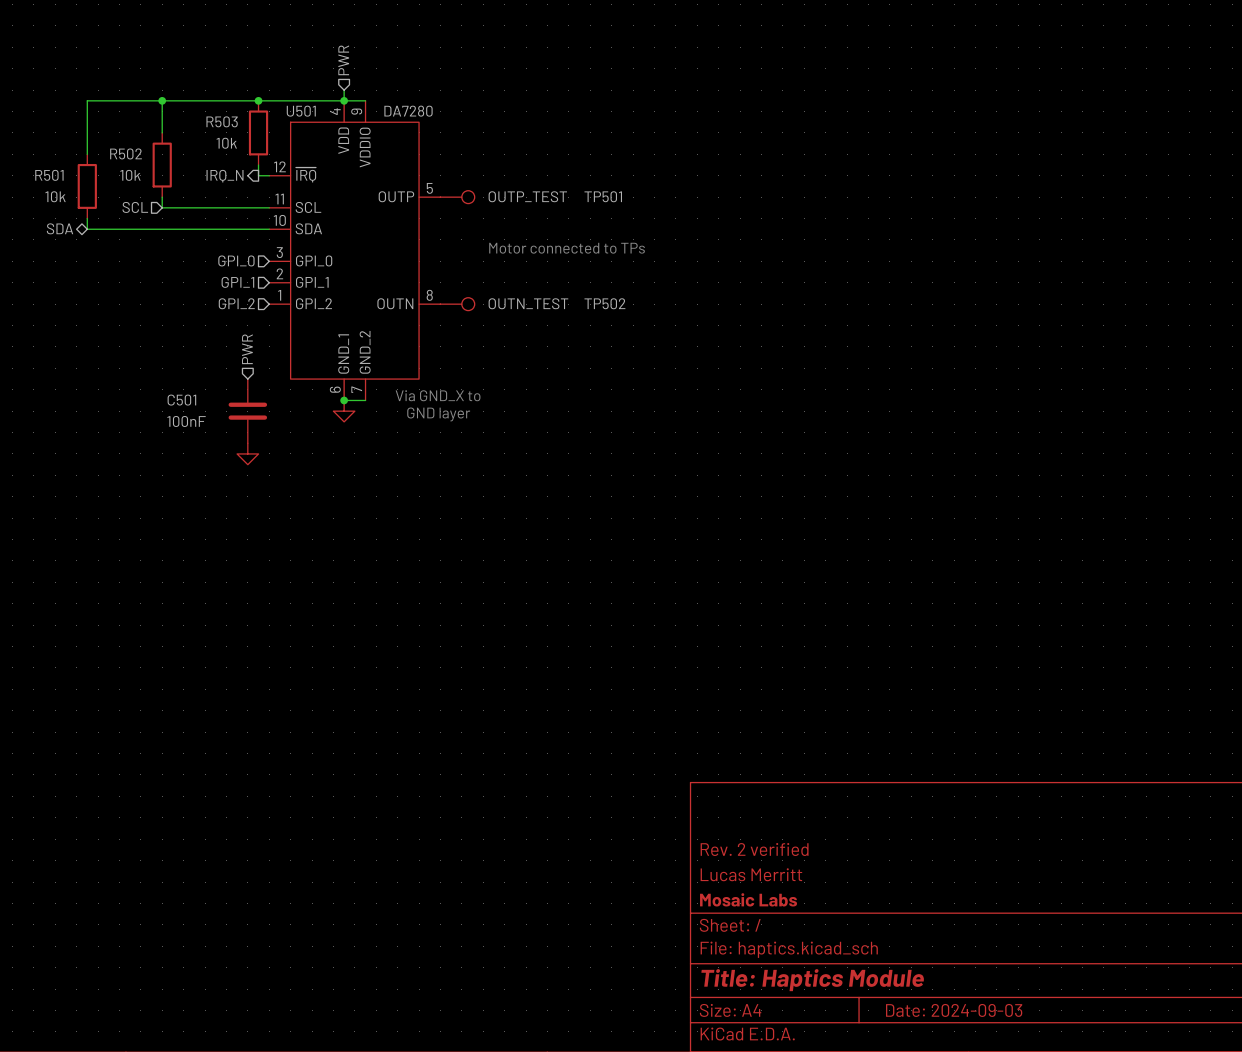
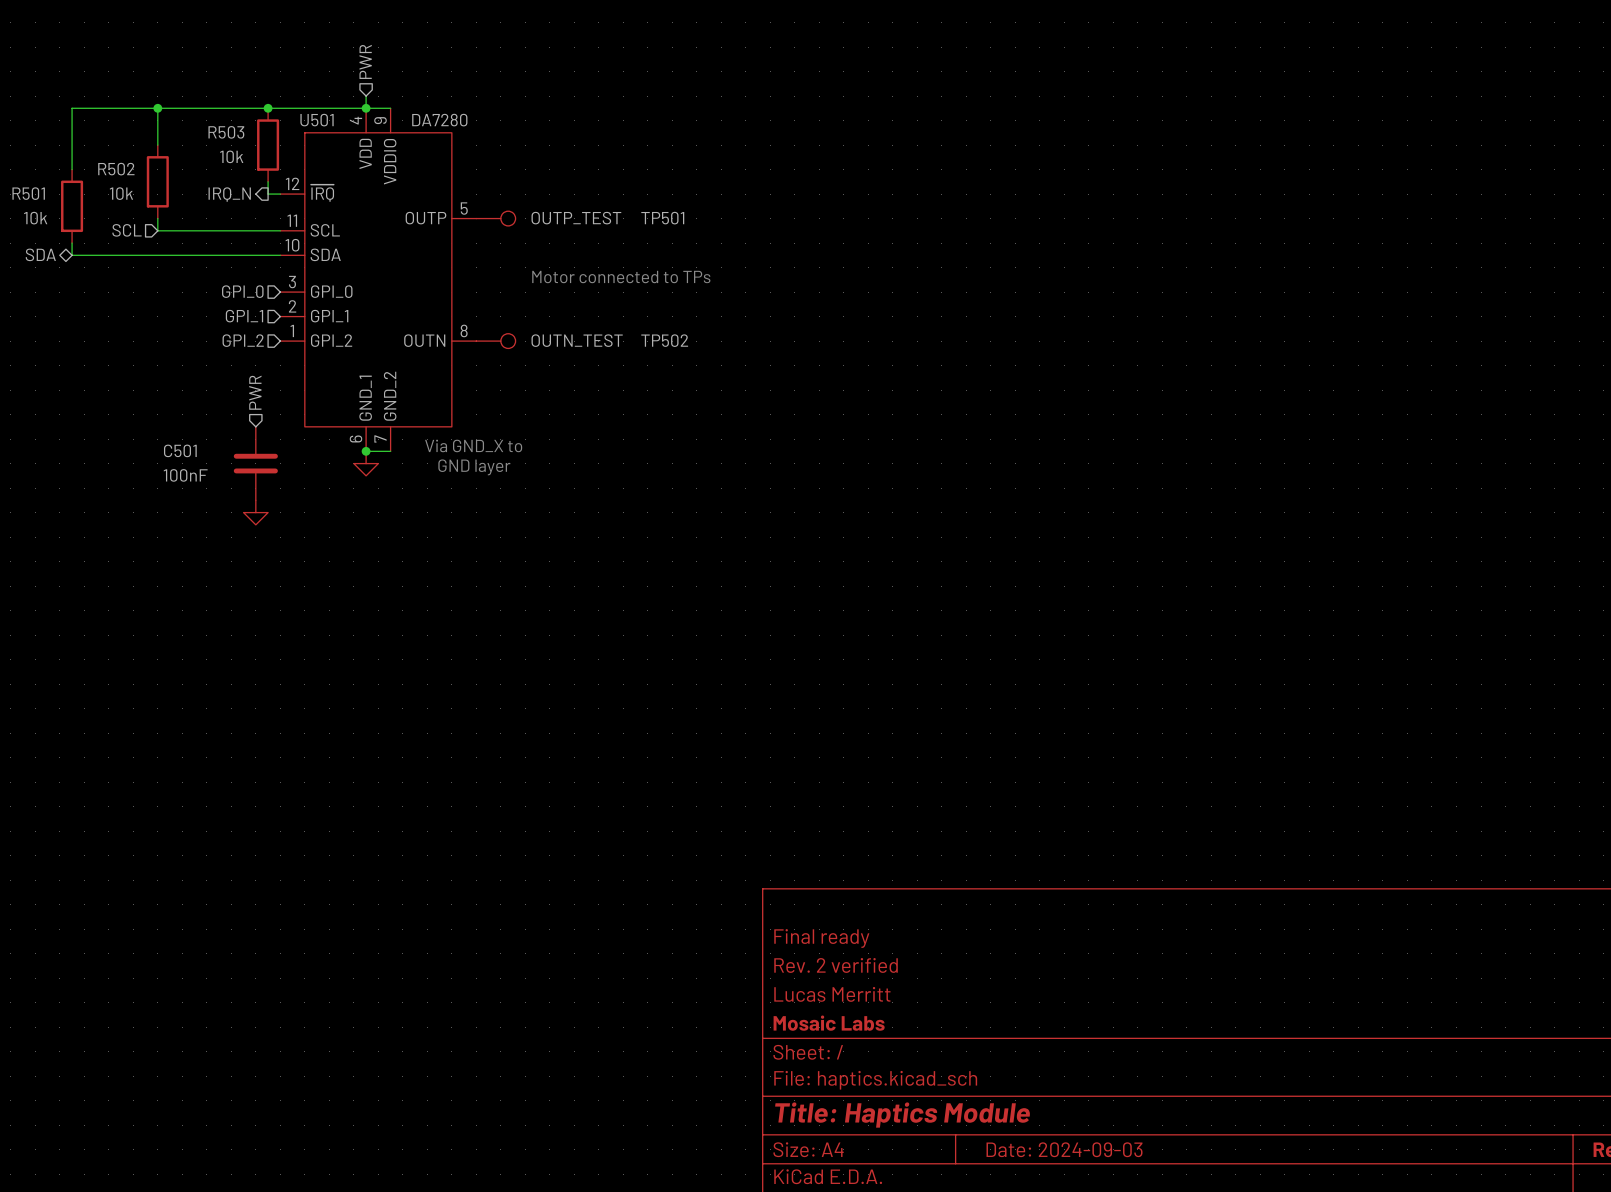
title block: none -> Final ready (821, 938)

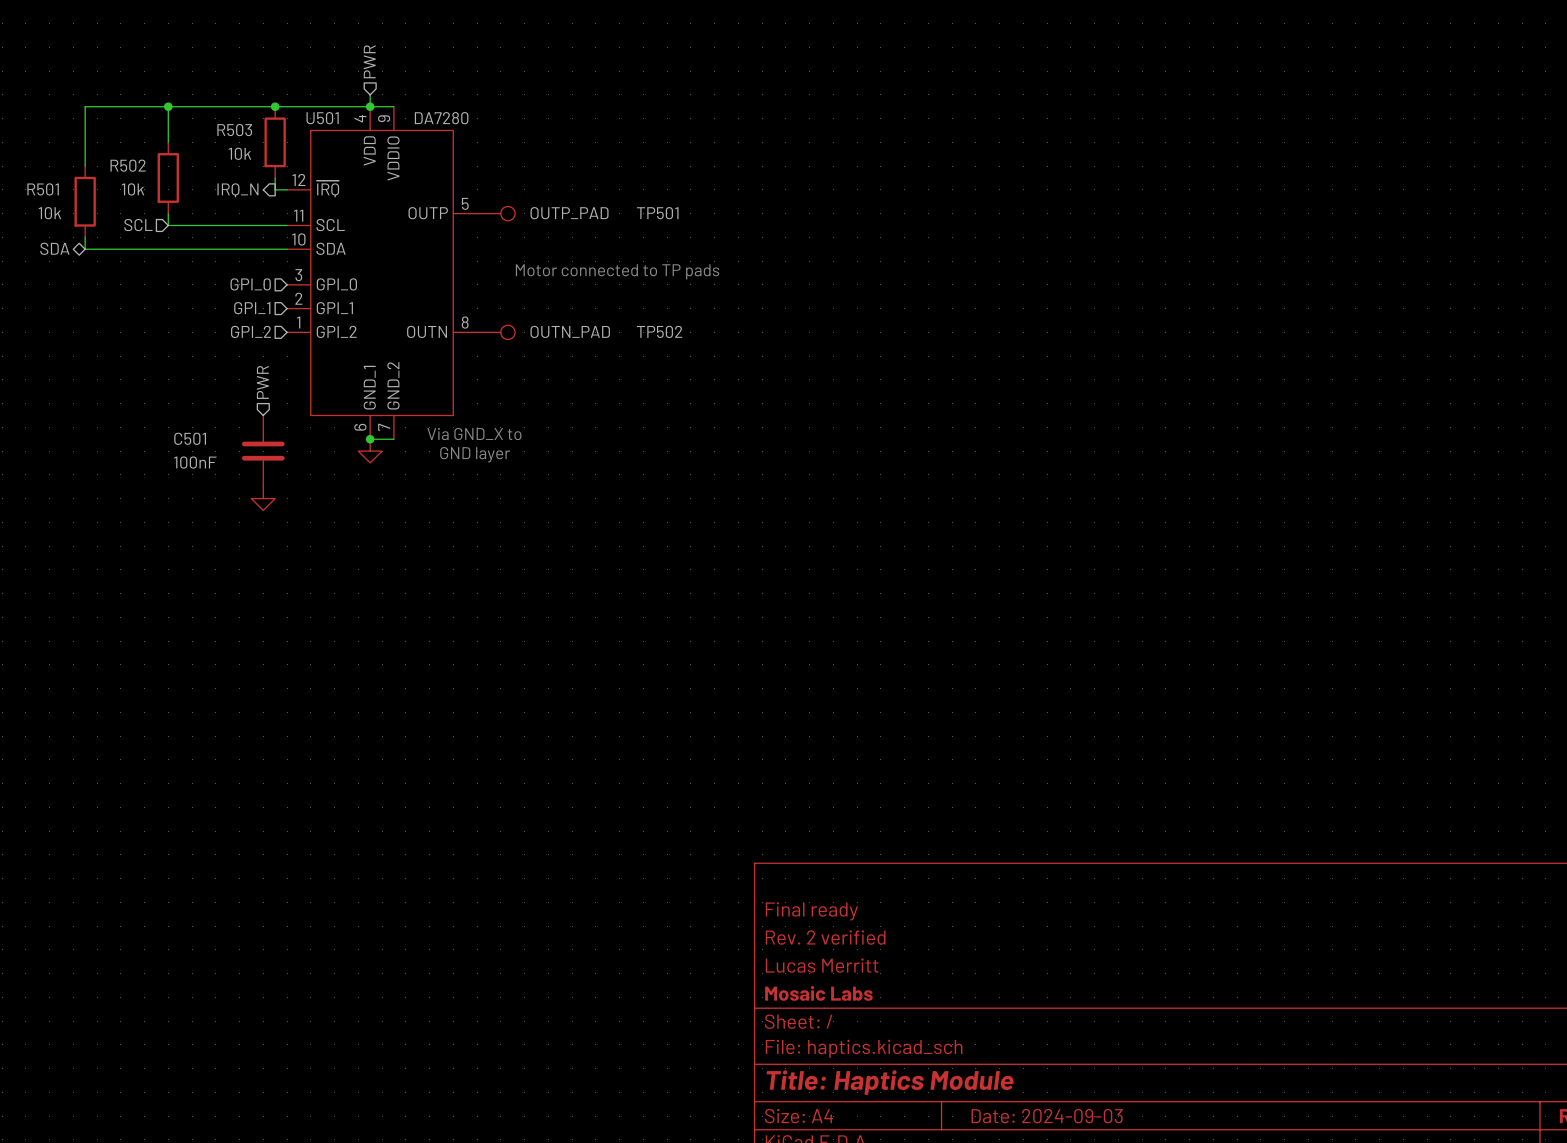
TP501 value: OUTP_TEST (576, 218) -> OUTP_PAD (569, 213)
text: Motor connected to TPs (621, 277) -> Motor connected to TP pads (617, 271)
TP502 value: OUTN_TEST (577, 340) -> OUTN_PAD (570, 331)

